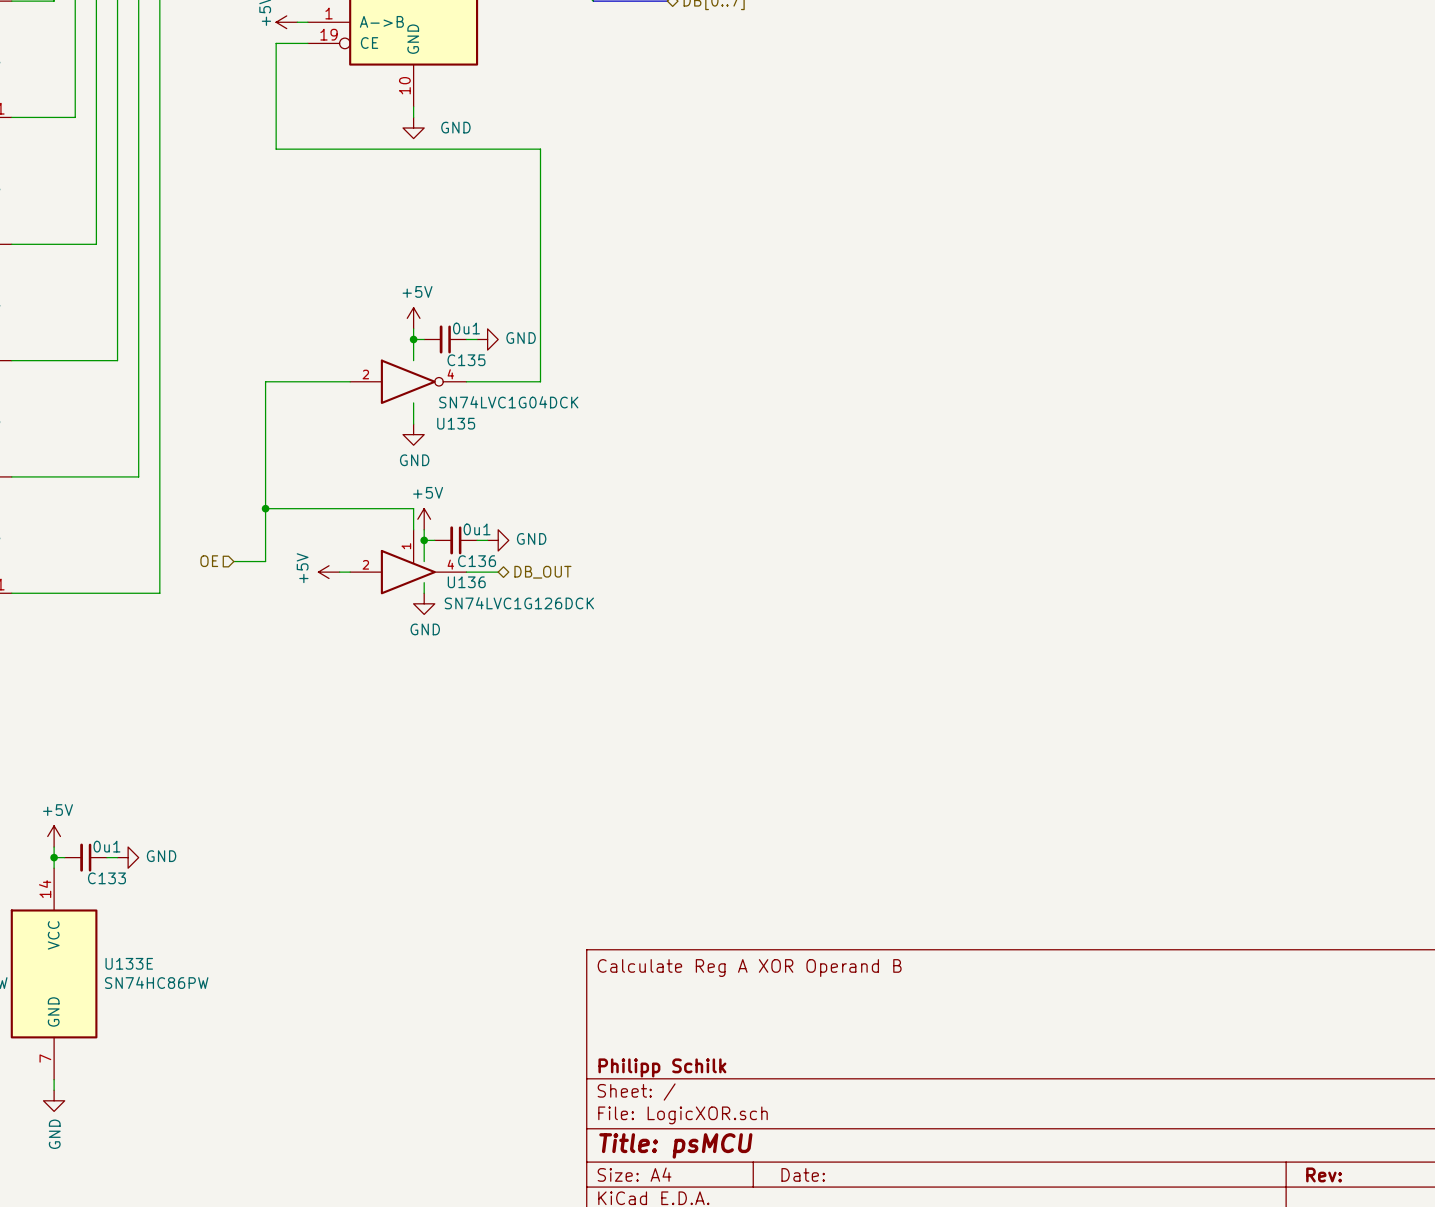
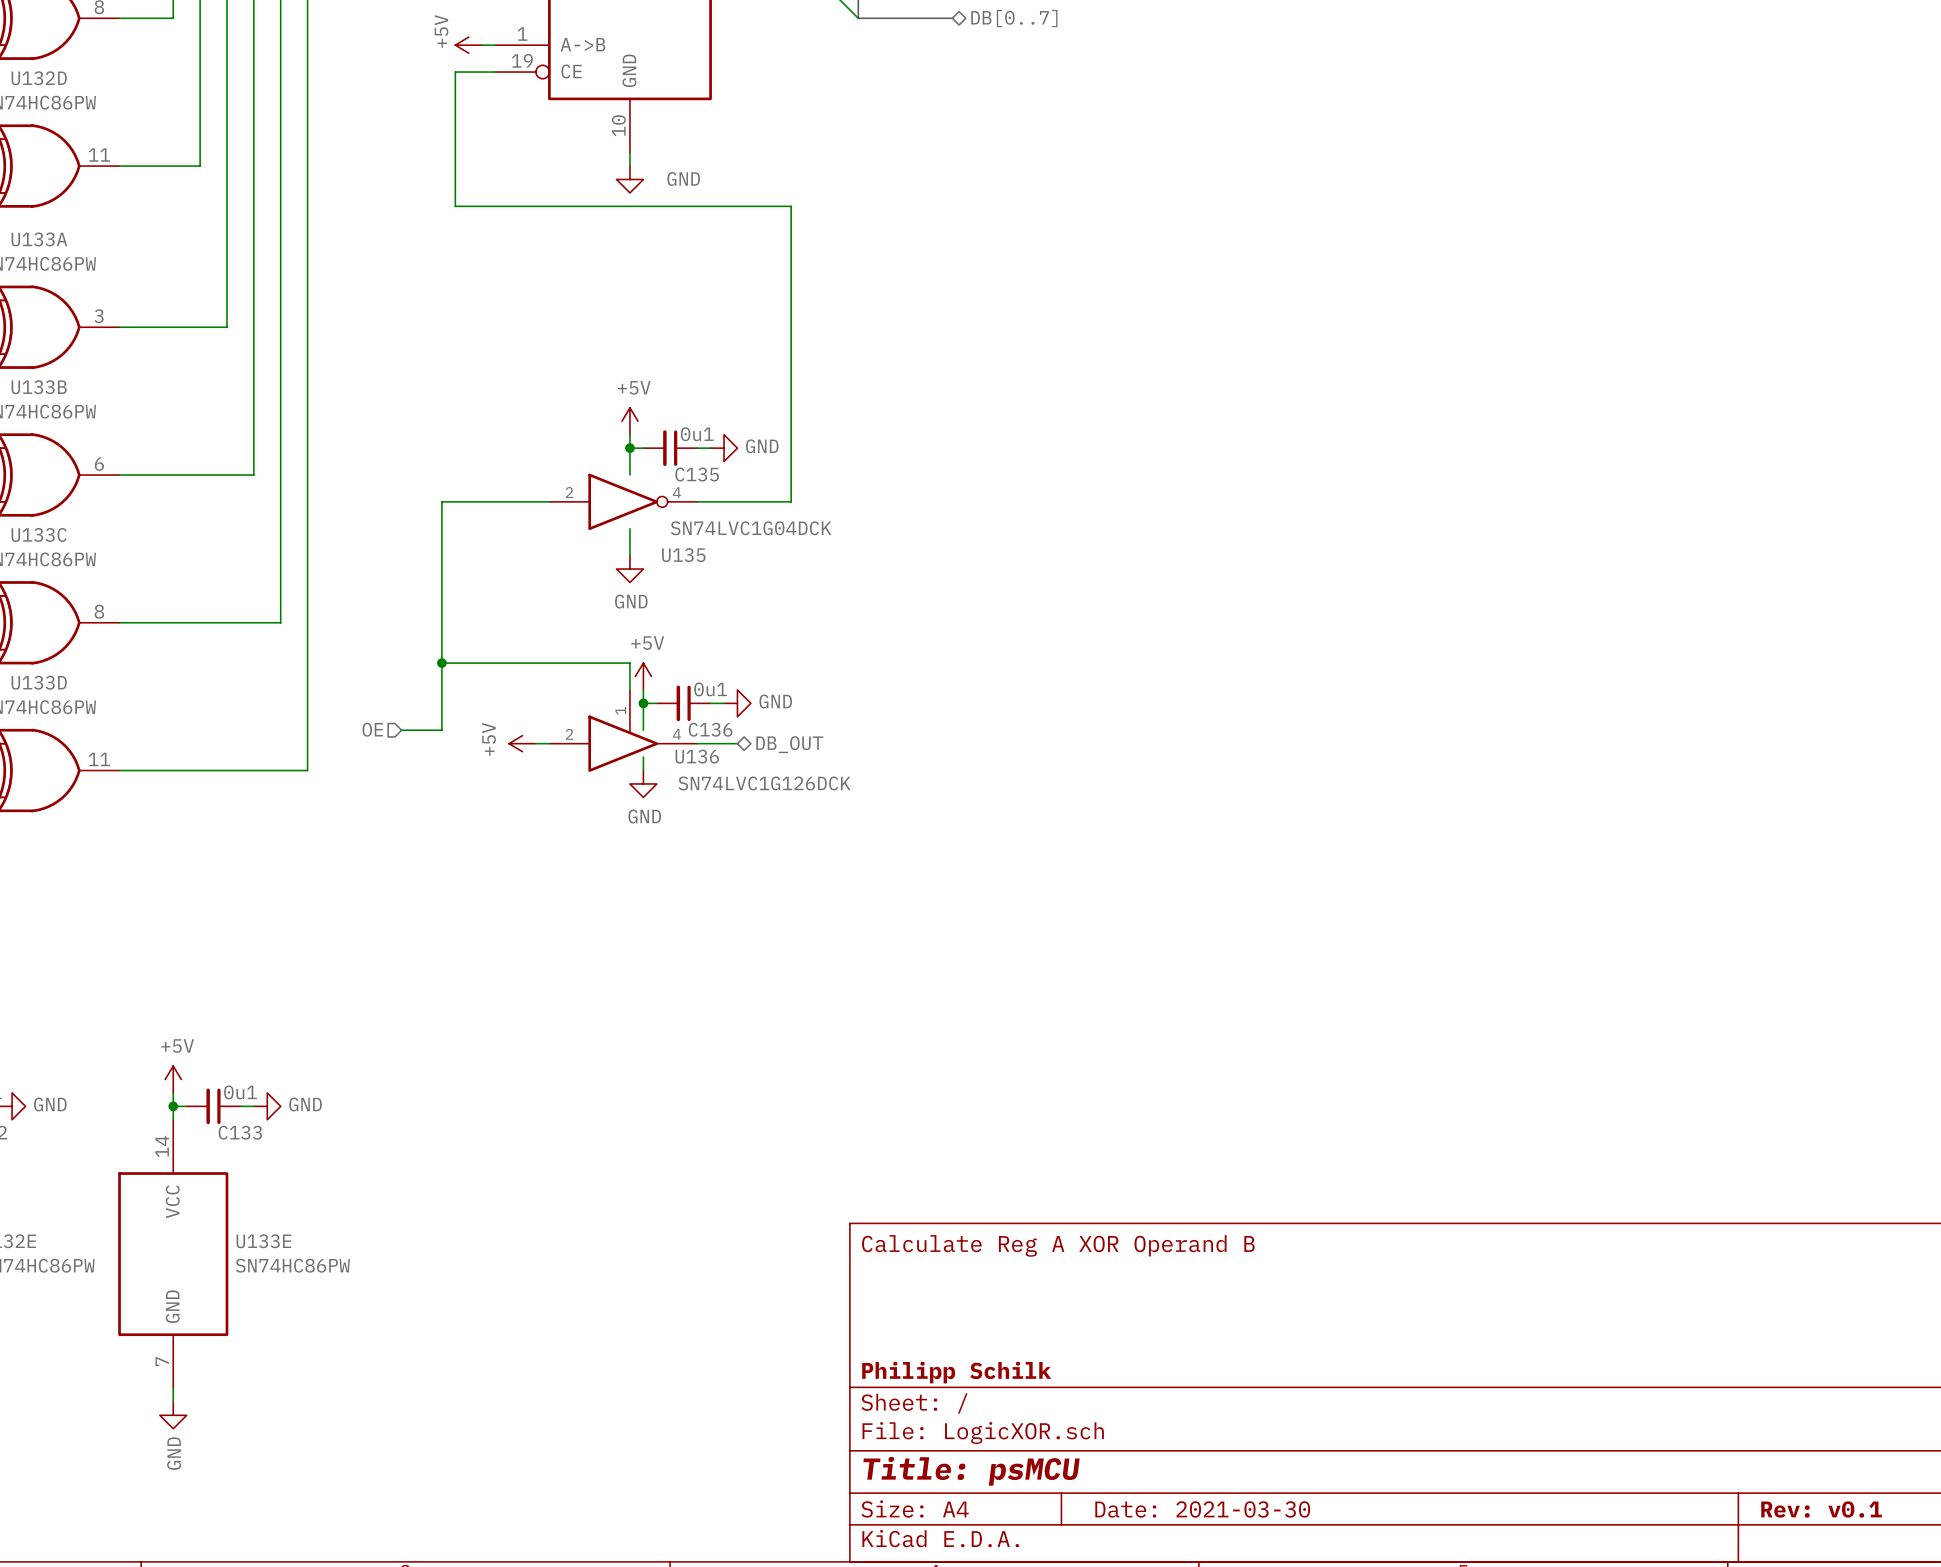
title block: Date: (803, 1174) -> Date: 2021-03-30 (1202, 1509)
title block: Rev: (1324, 1174) -> Rev: v0.1 (1821, 1509)

